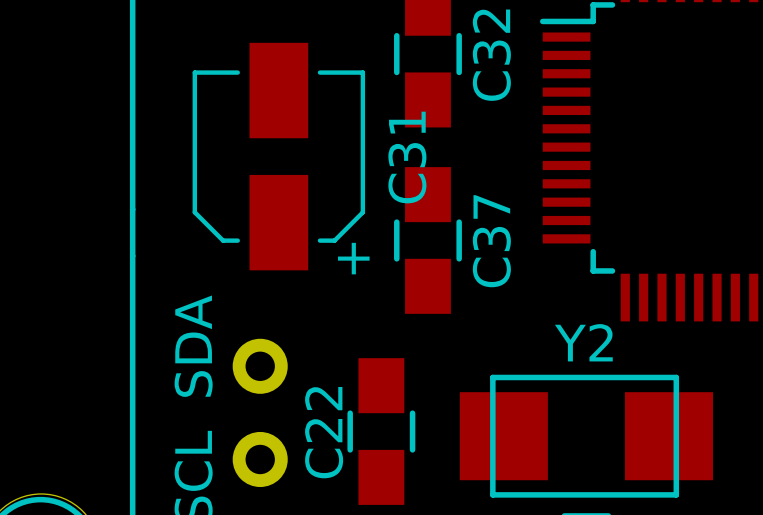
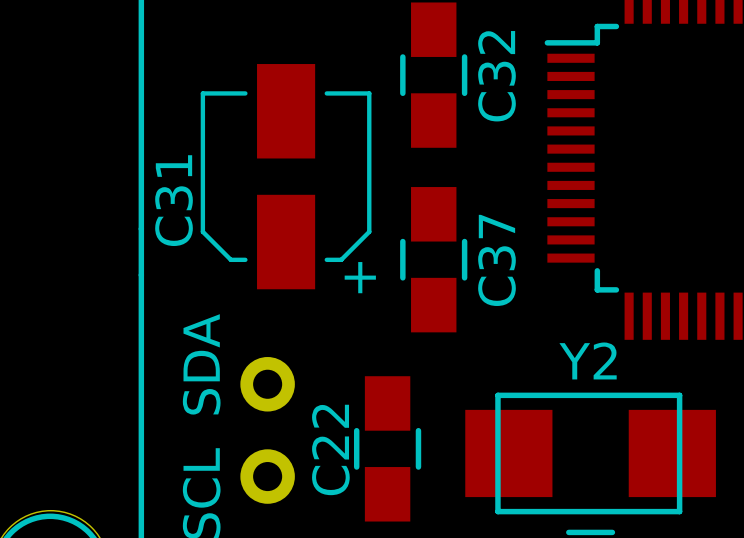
C31 name position: C31 (407, 157) -> C31 (174, 200)

